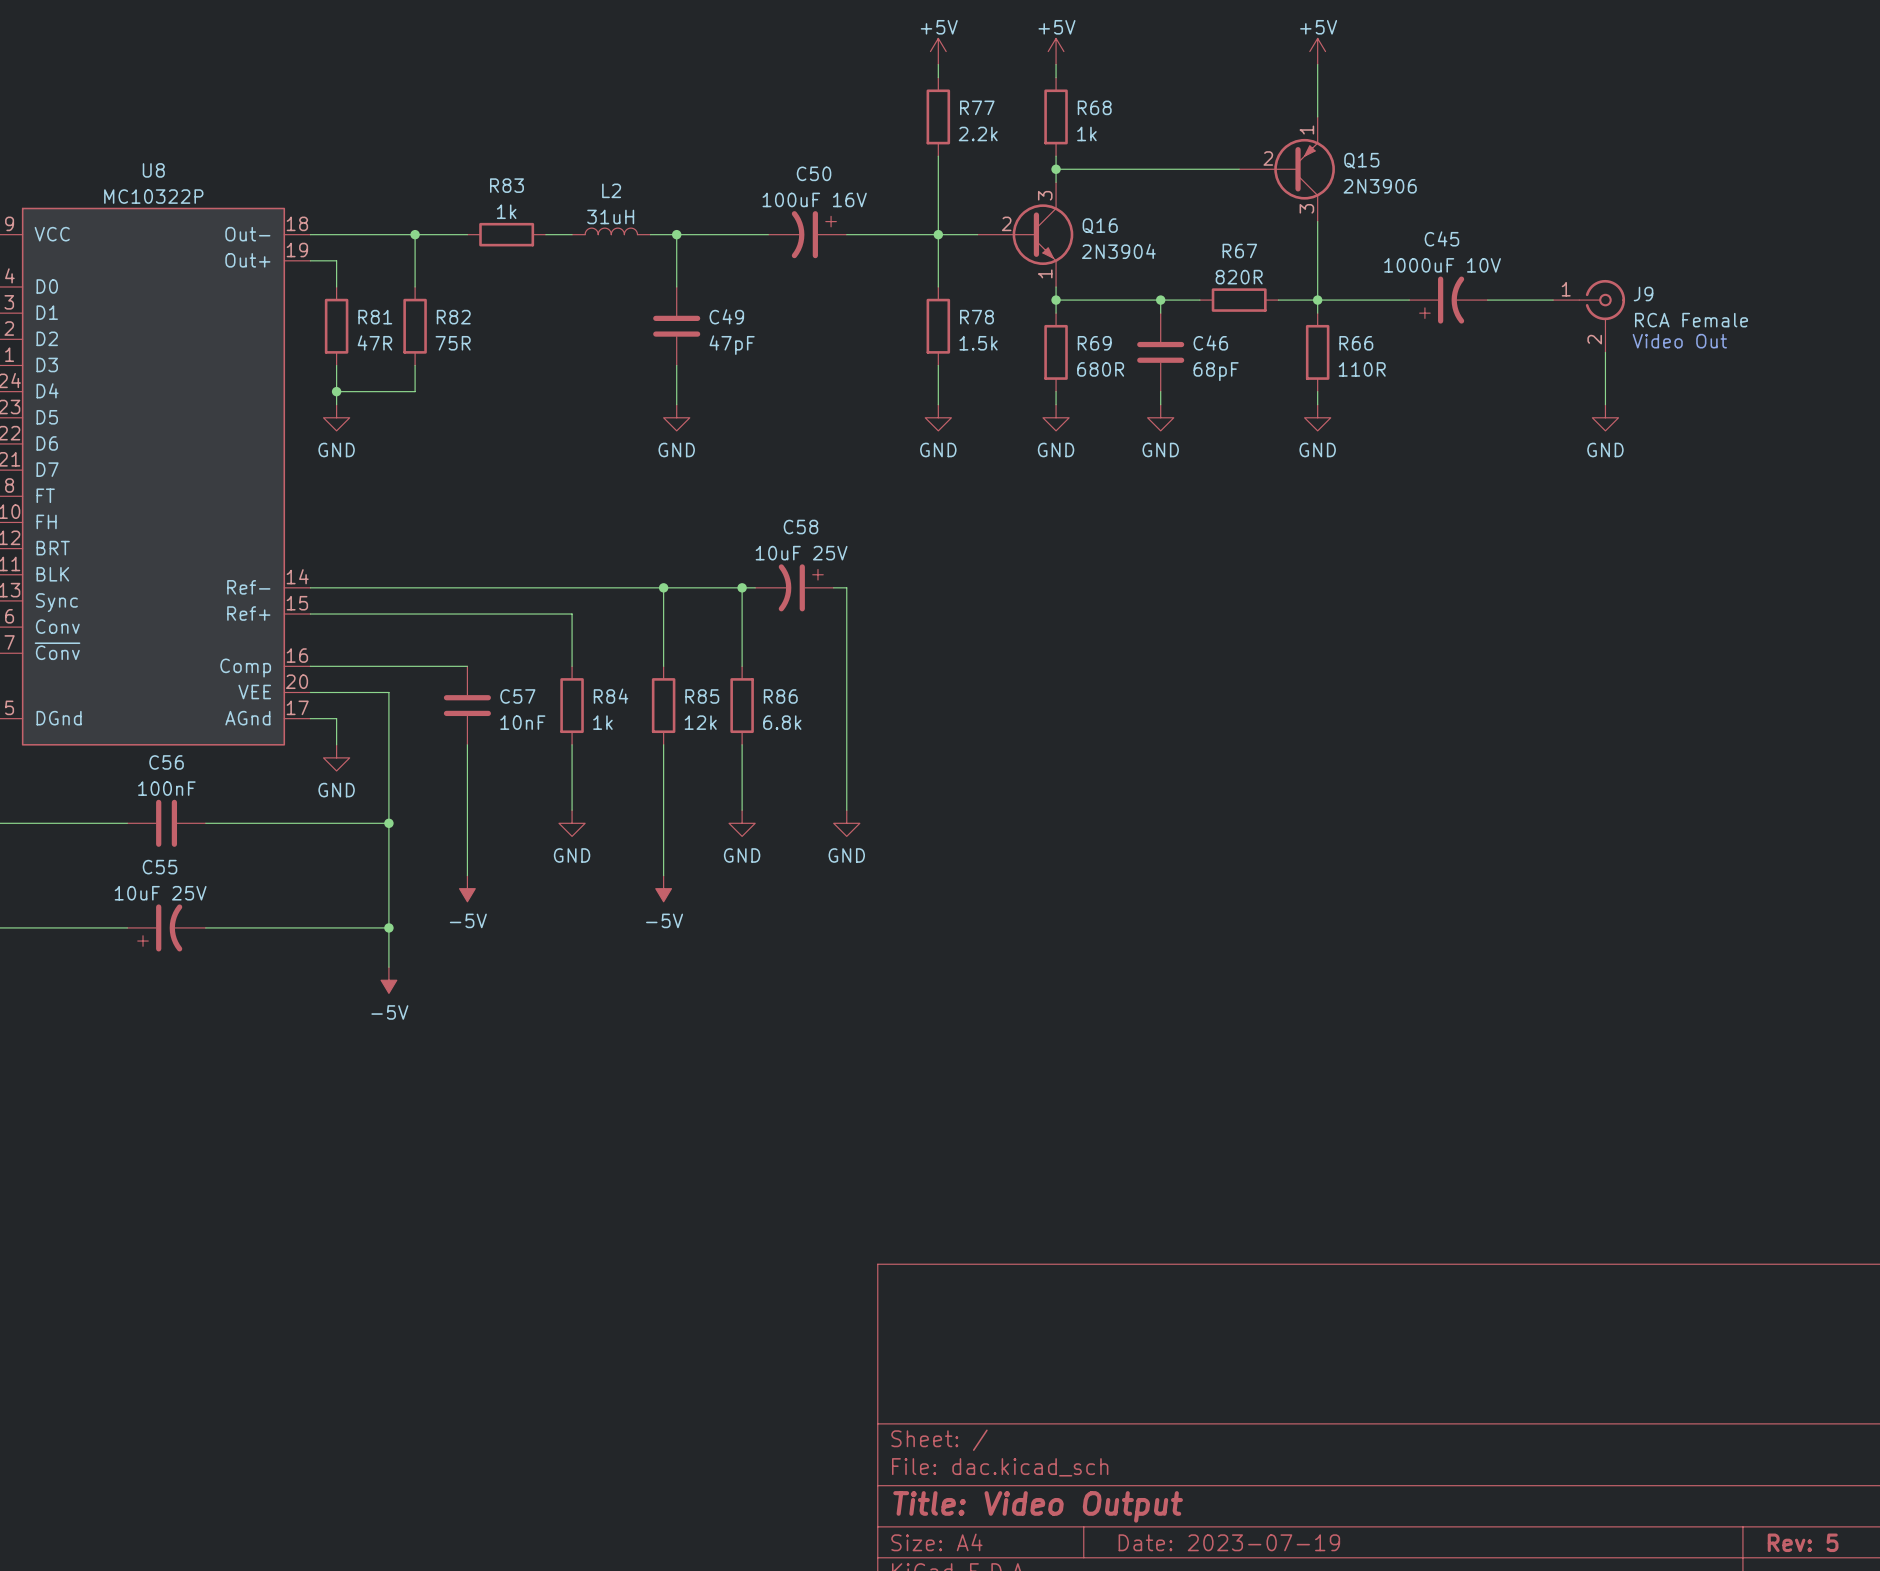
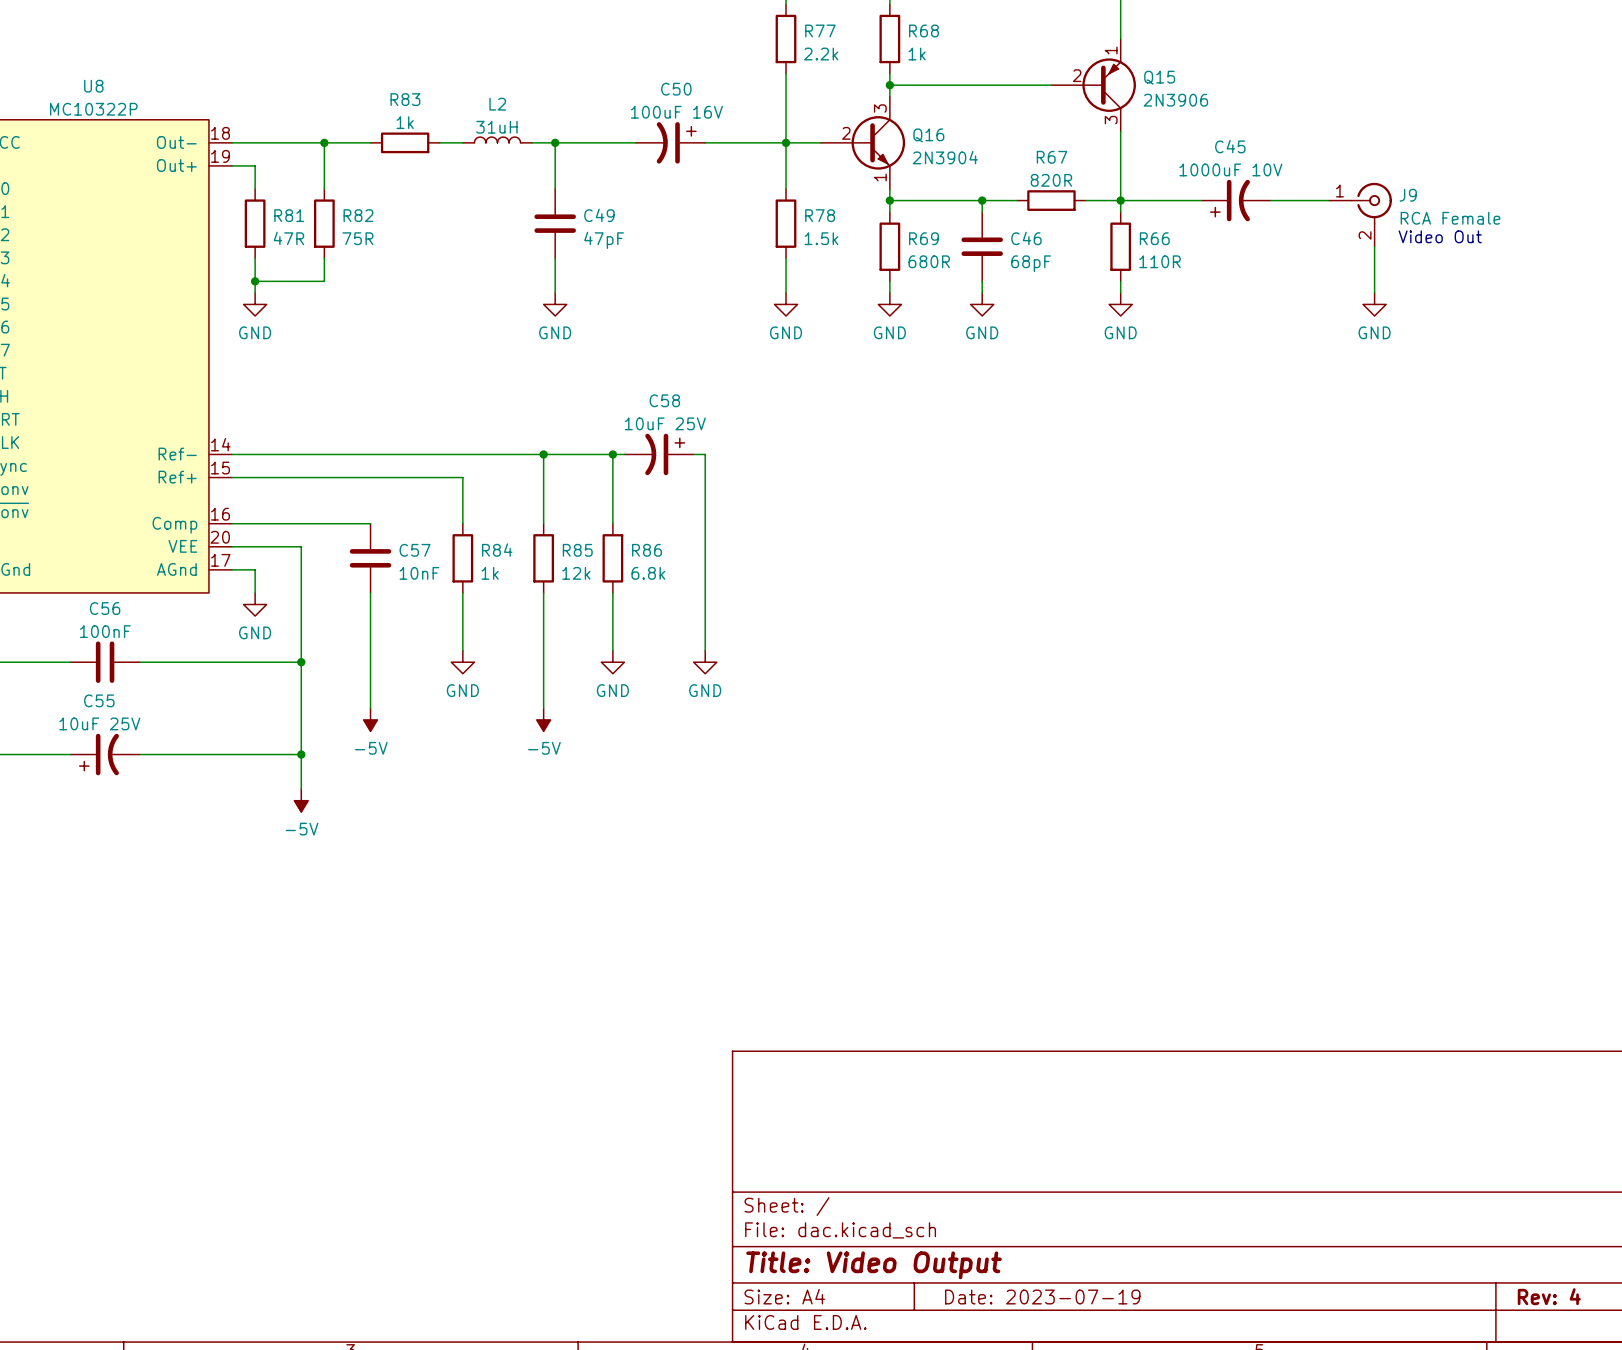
title block: Rev: 5 (1803, 1542) -> Rev: 4 (1549, 1296)

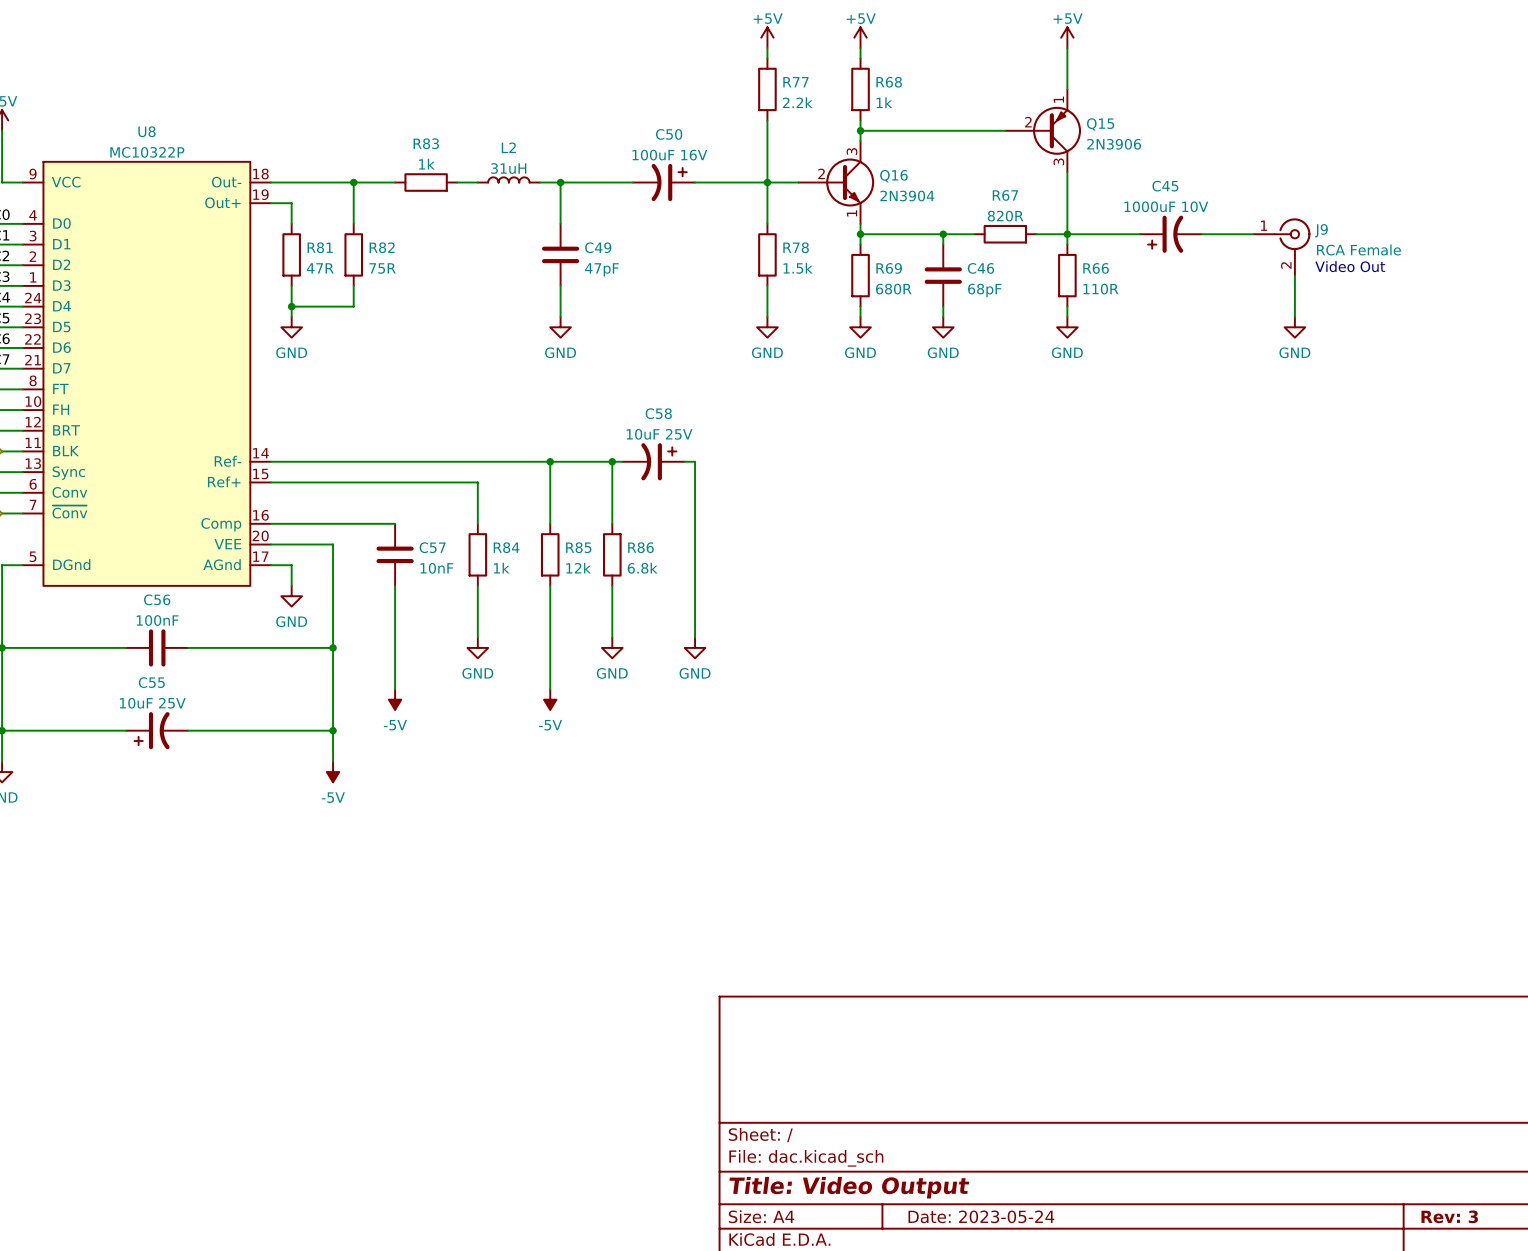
title block: Rev: 4 (1549, 1296) -> Rev: 3 (1449, 1216)
title block: Date: 2023-07-19 (1042, 1297) -> Date: 2023-05-24 (981, 1216)

